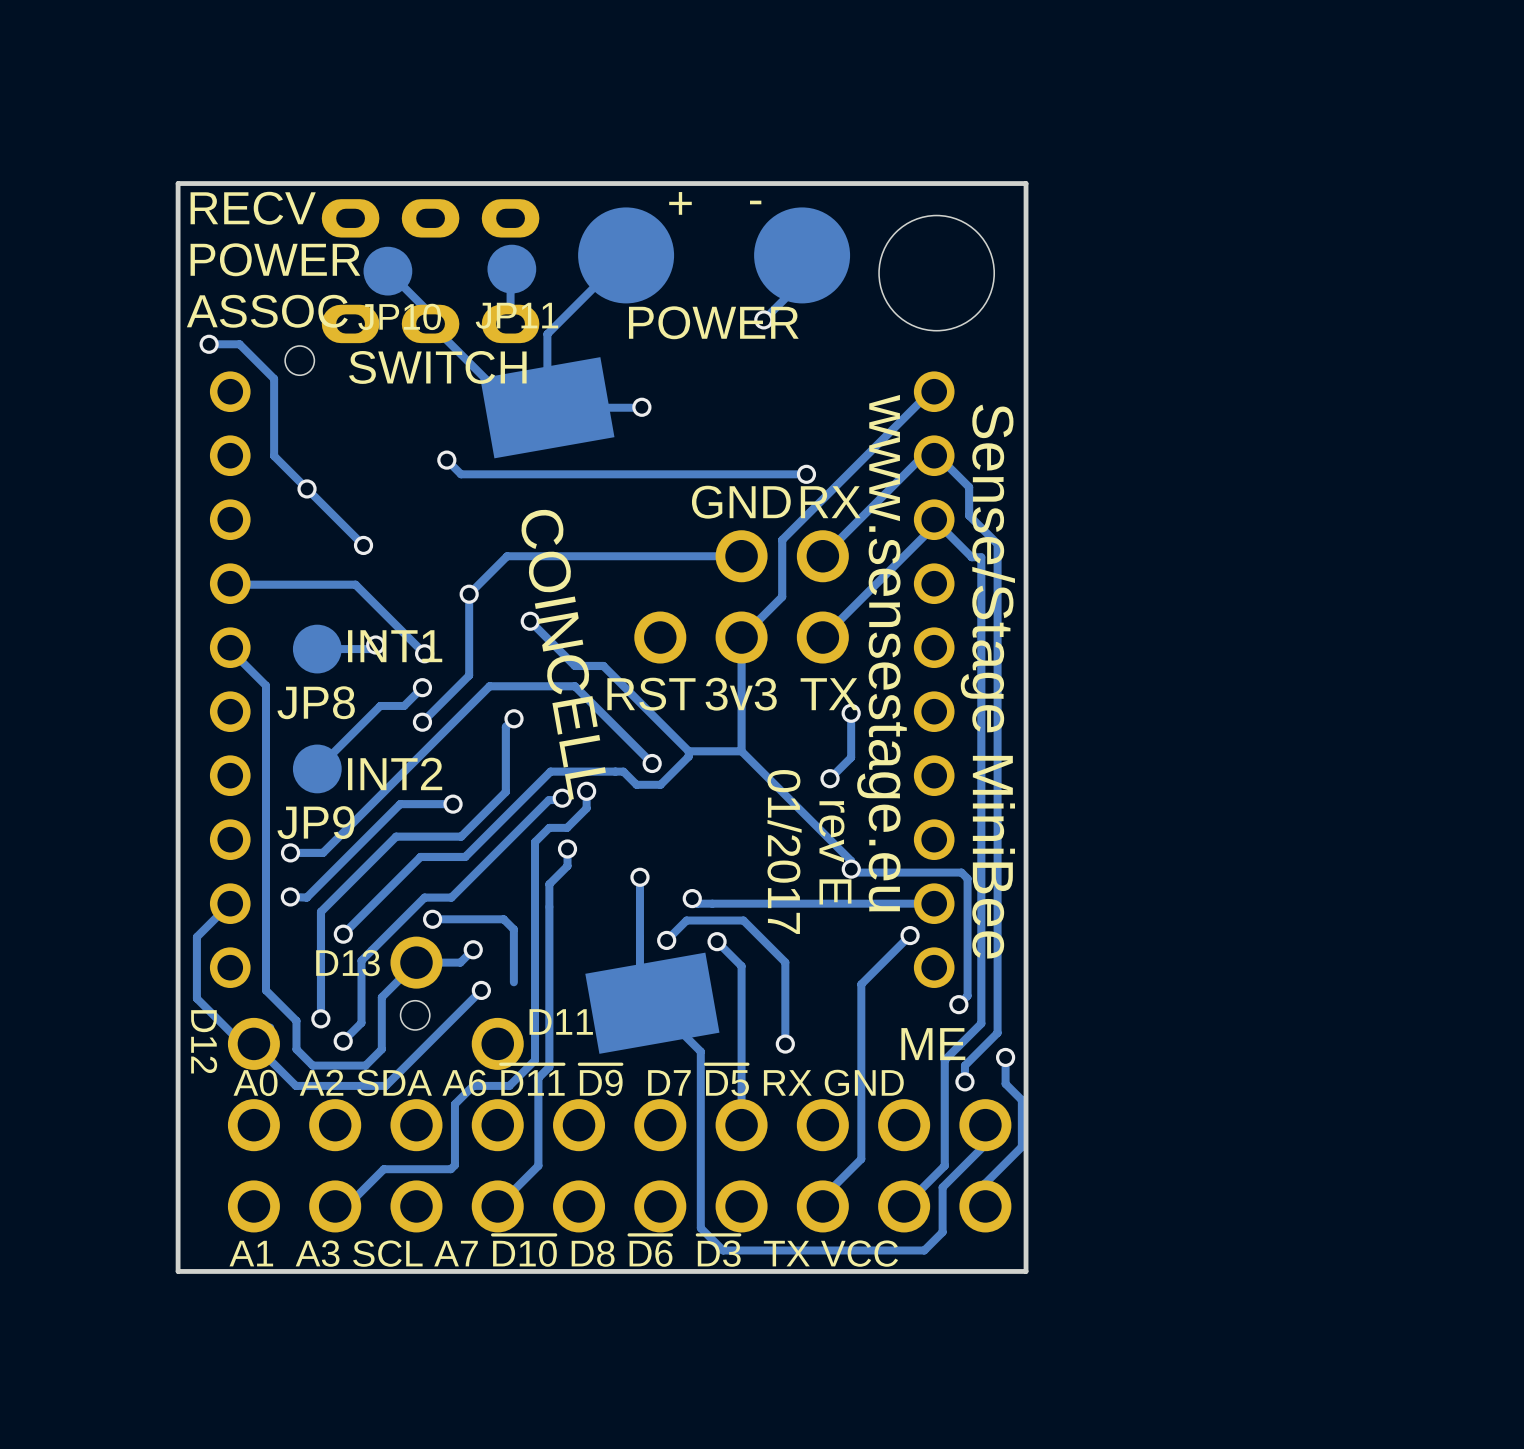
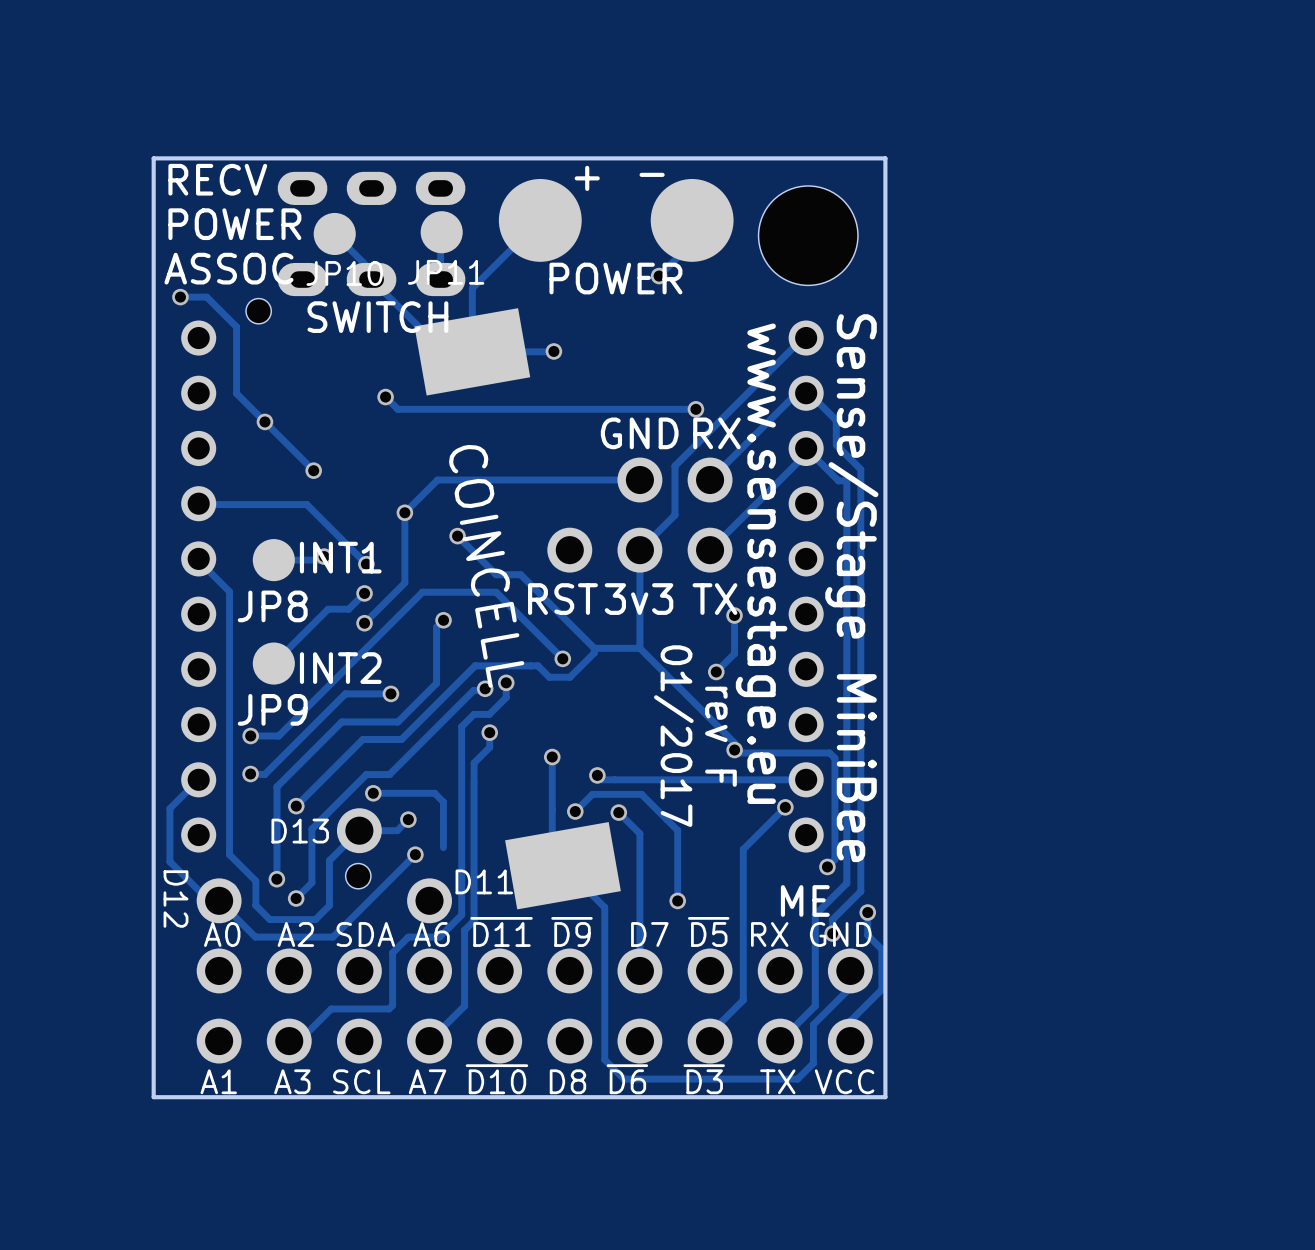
text: rev E (835, 852) -> rev F (720, 736)

